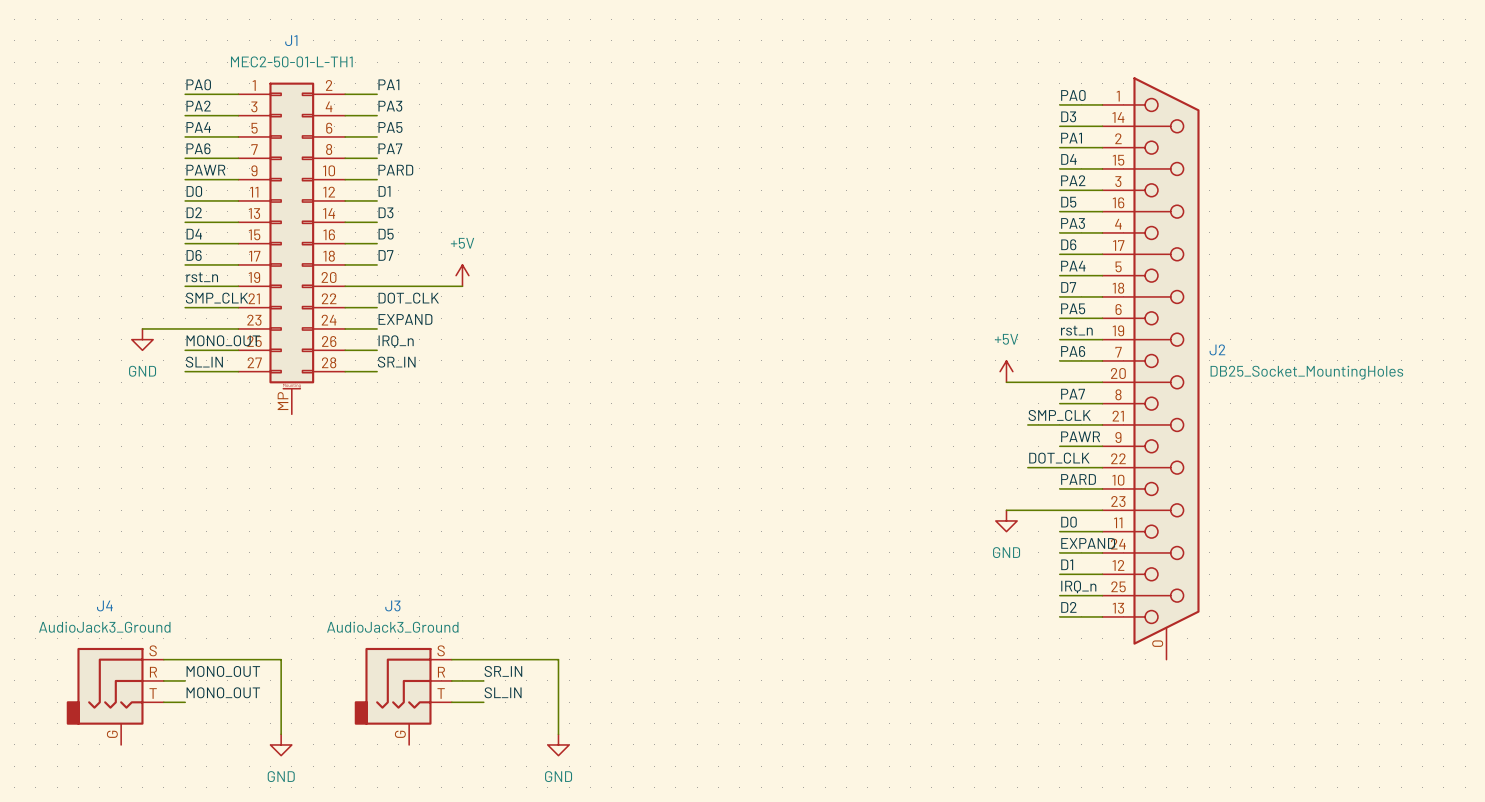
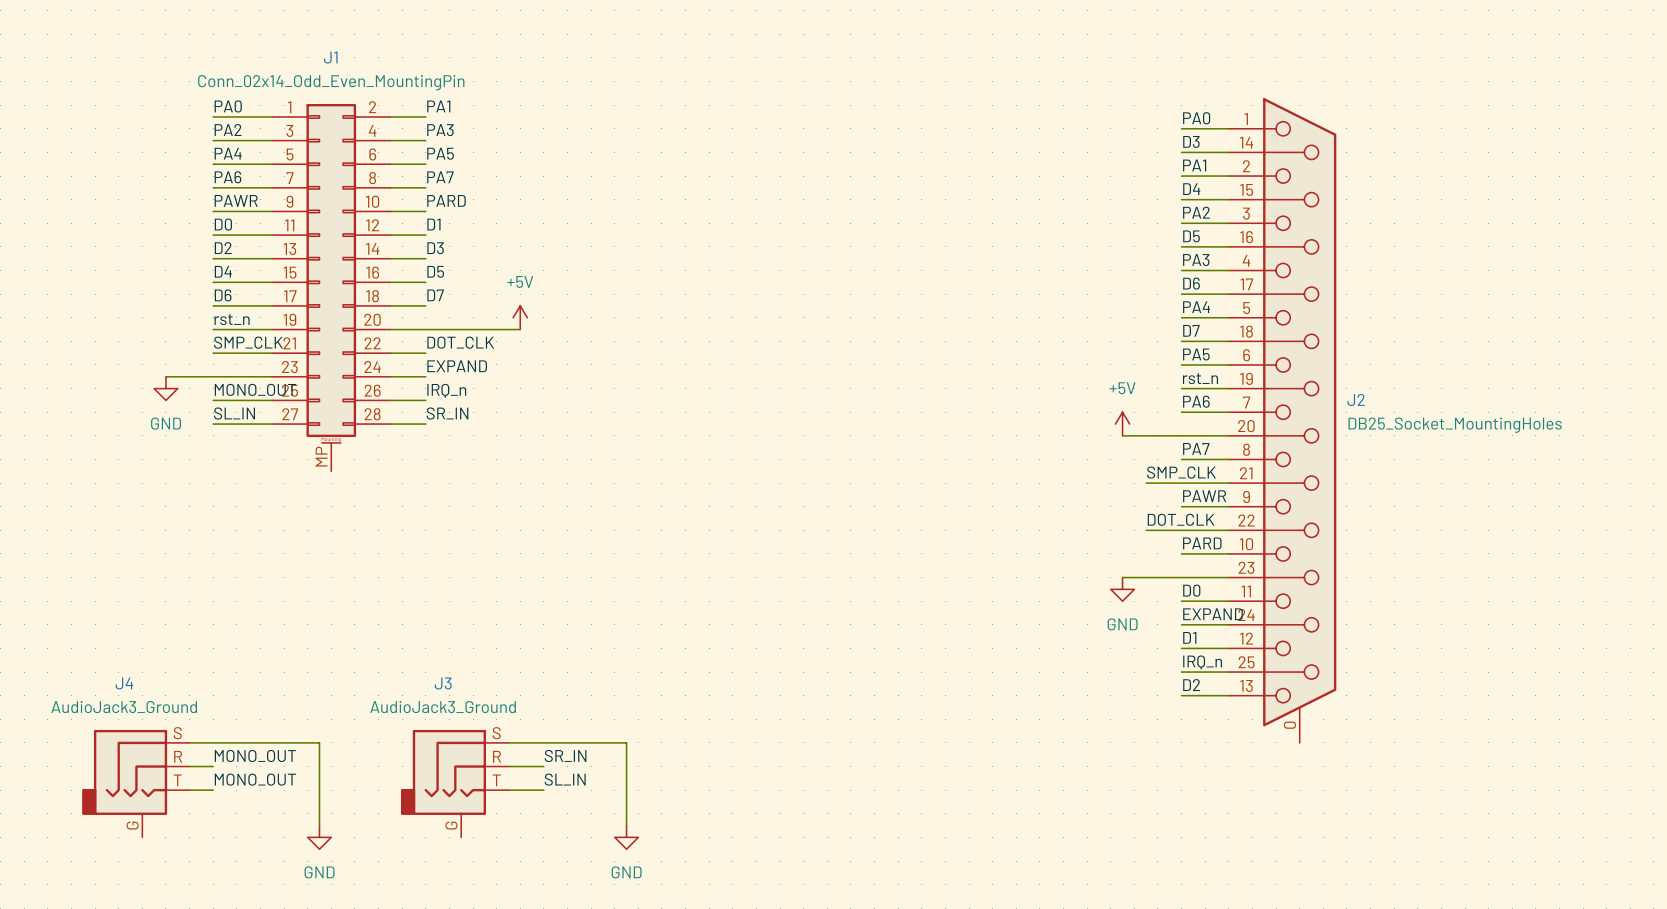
J1 value: MEC2-50-01-L-TH1 (291, 61) -> Conn_02x14_Odd_Even_MountingPin (331, 82)

